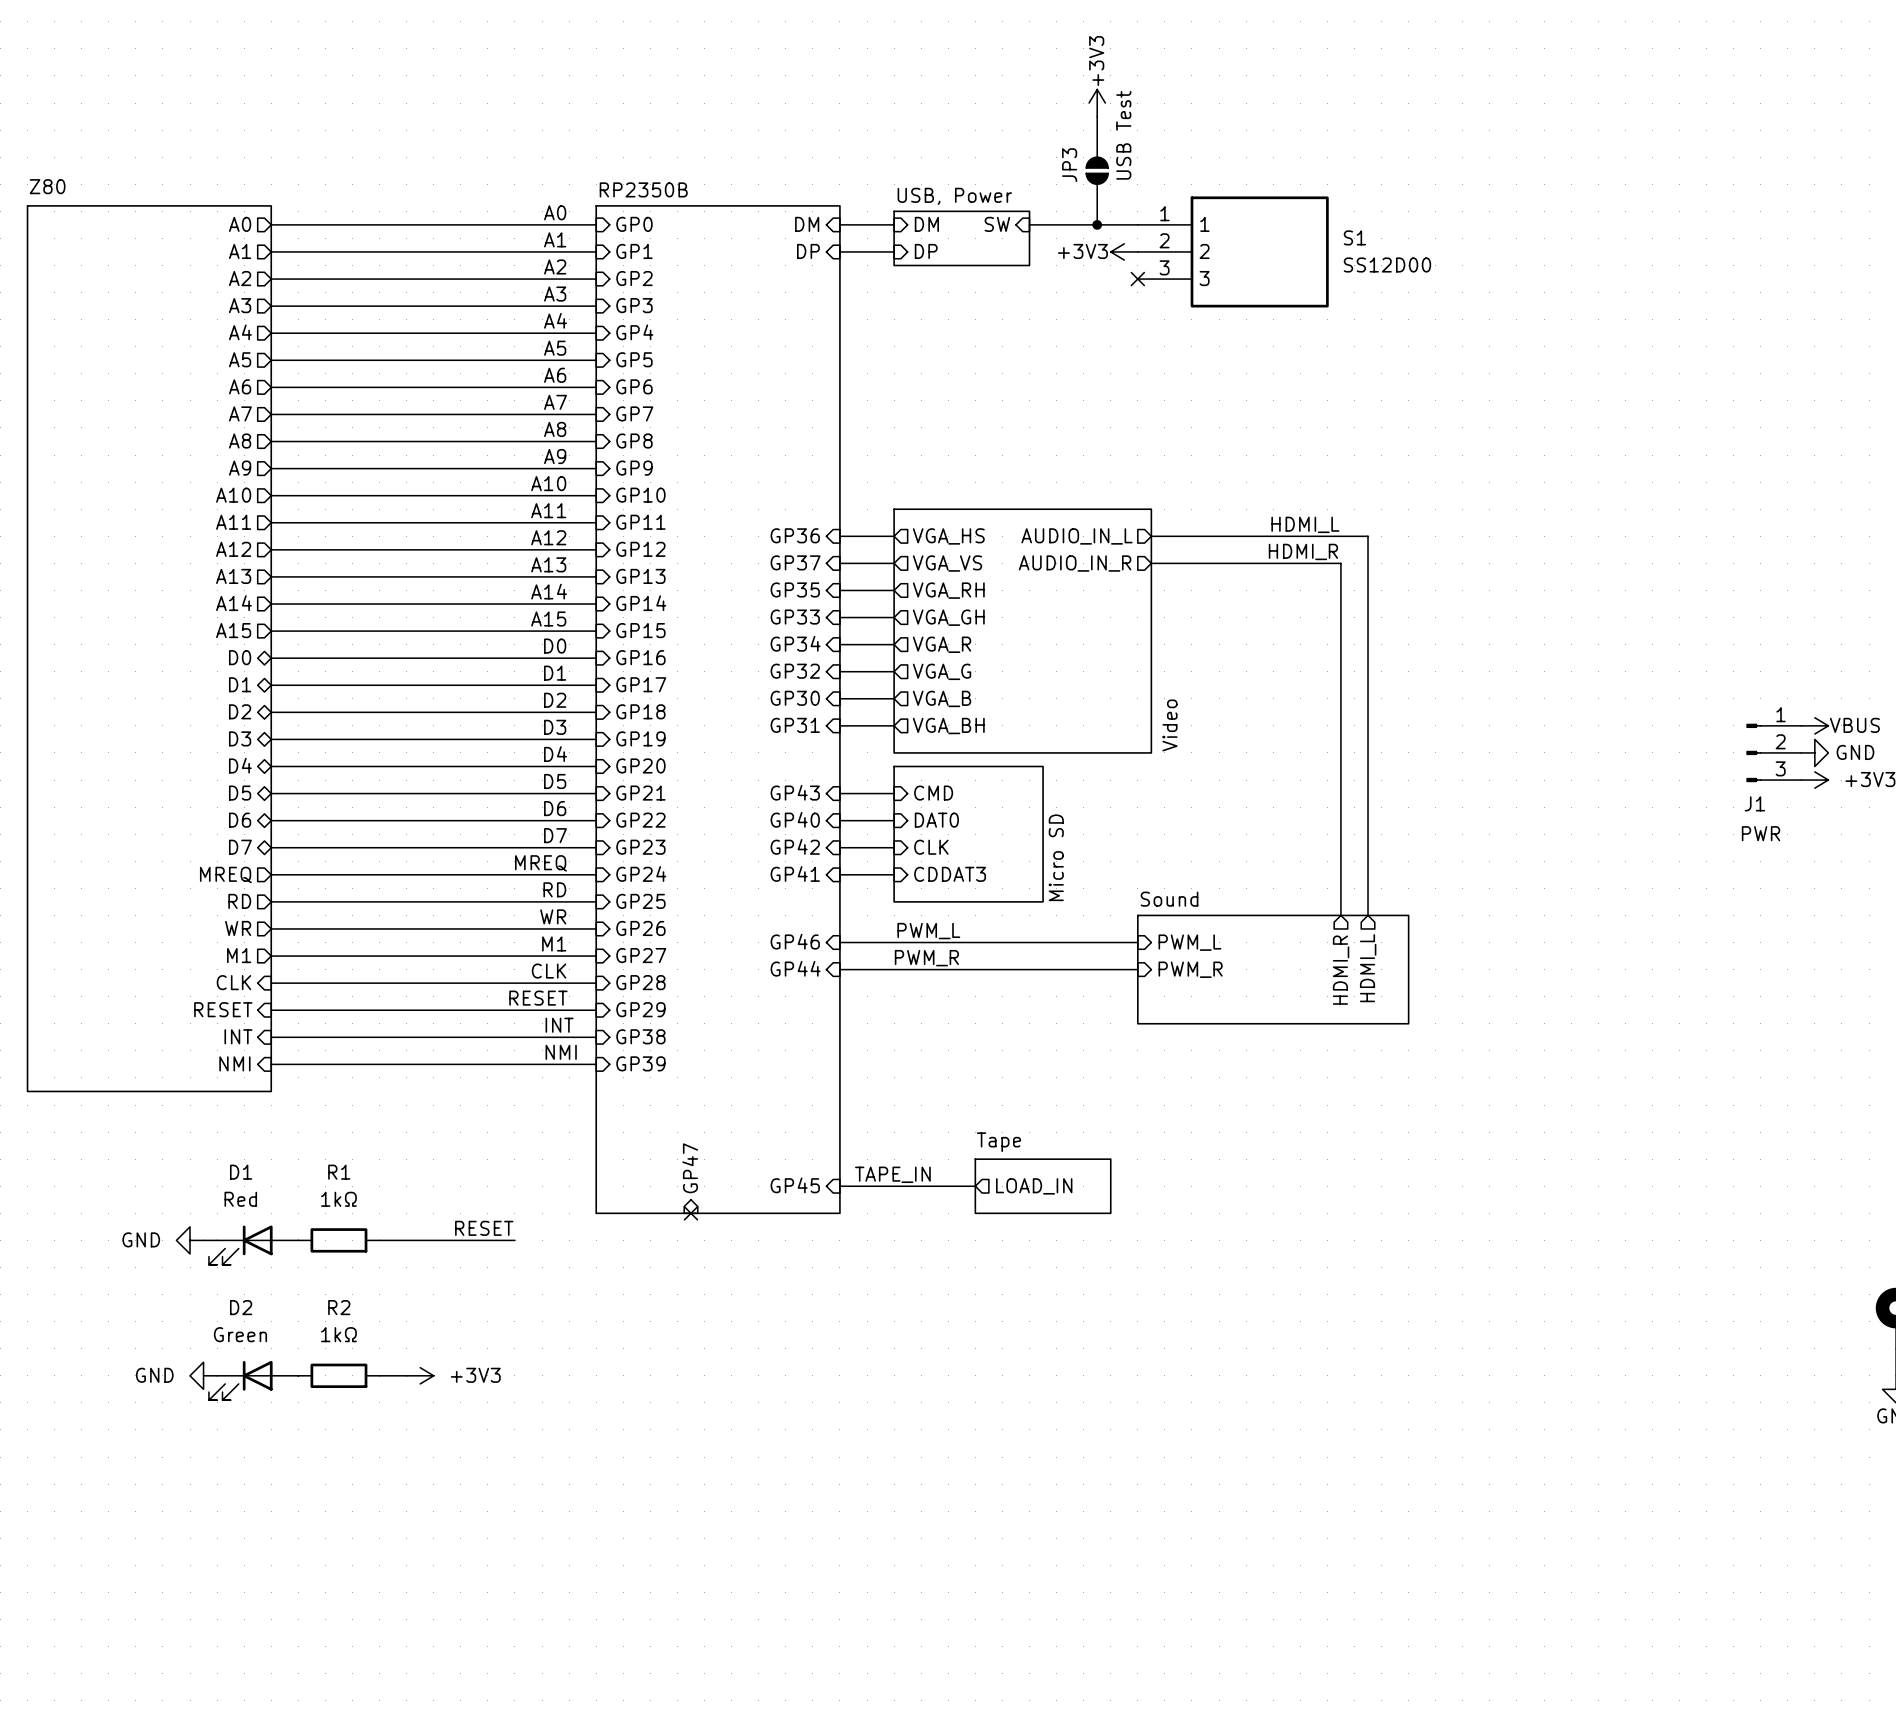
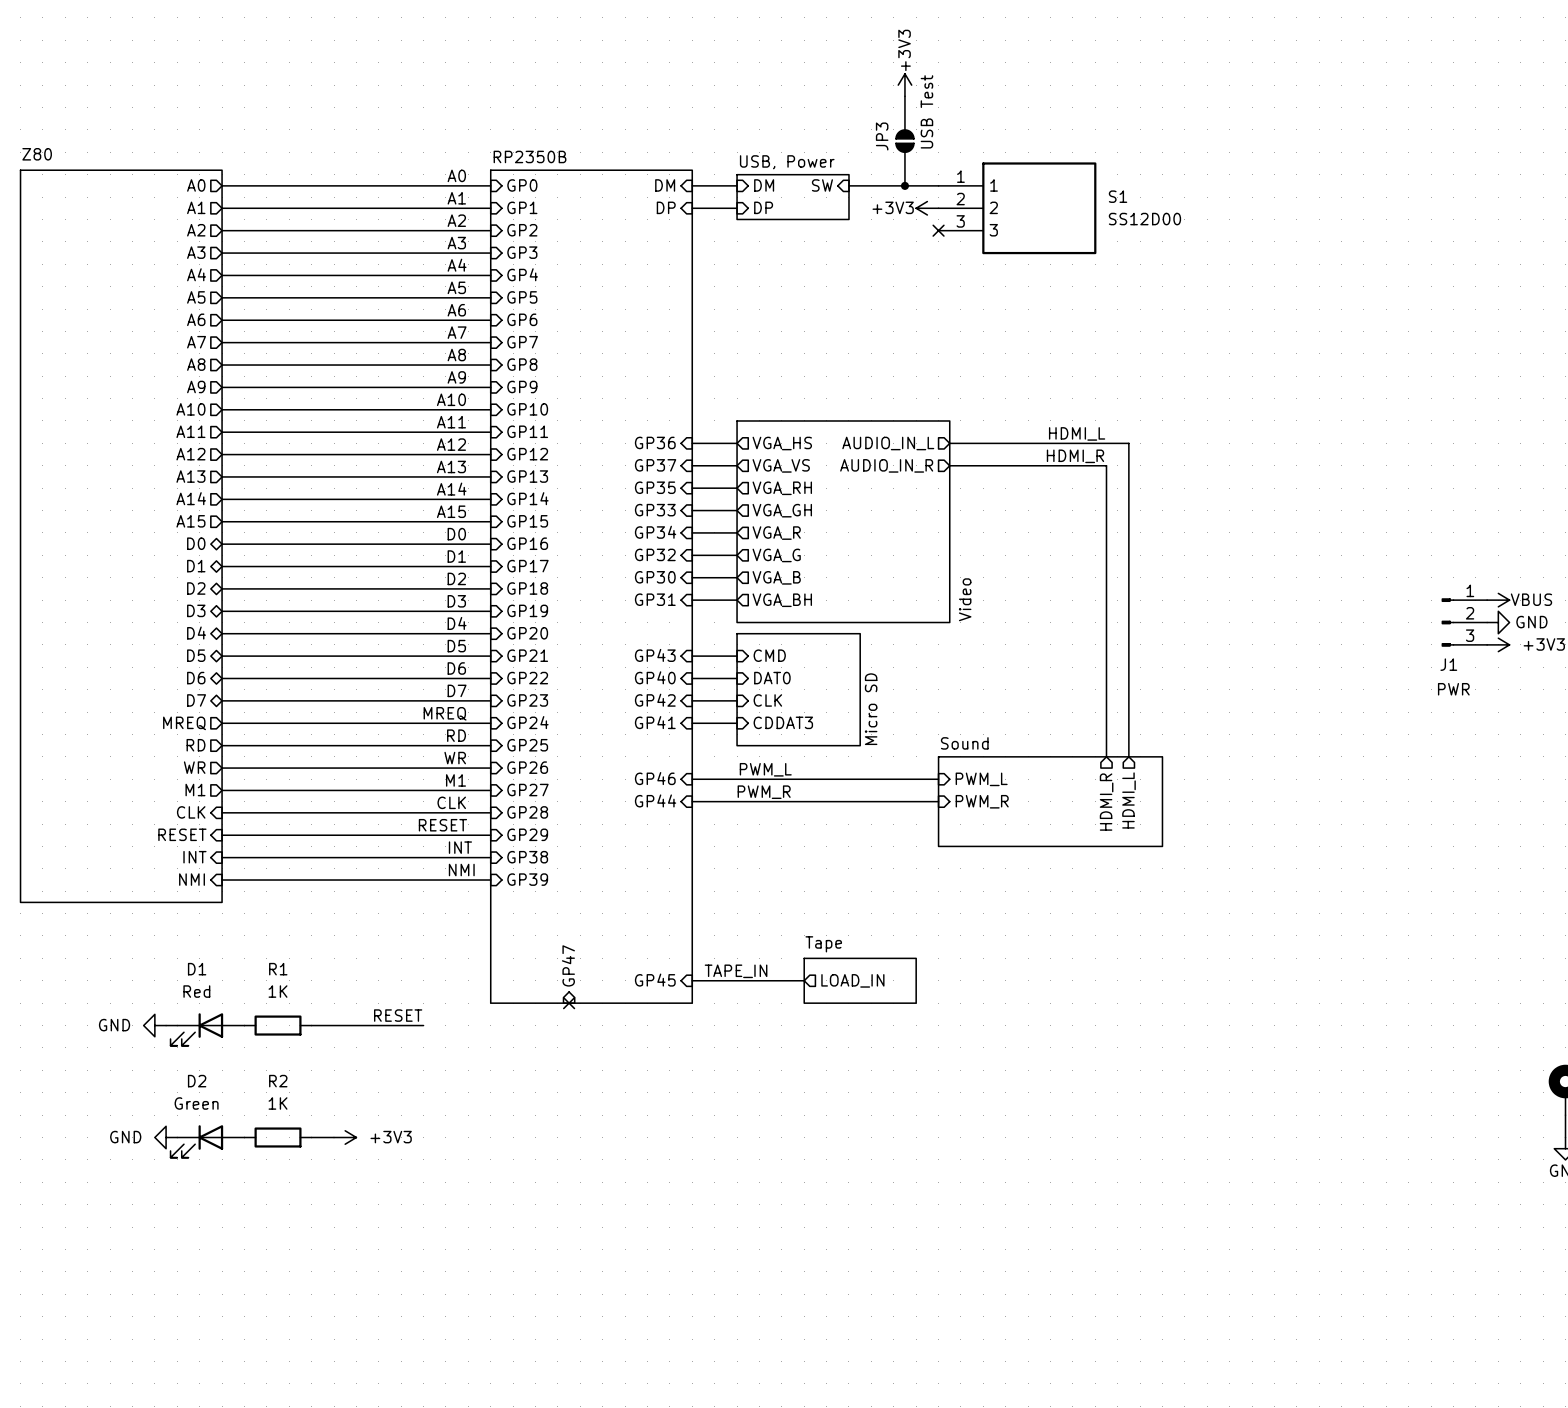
R1 value: 1kΩ (338, 1199) -> 1K (278, 991)
R2 value: 1kΩ (338, 1334) -> 1K (278, 1103)

